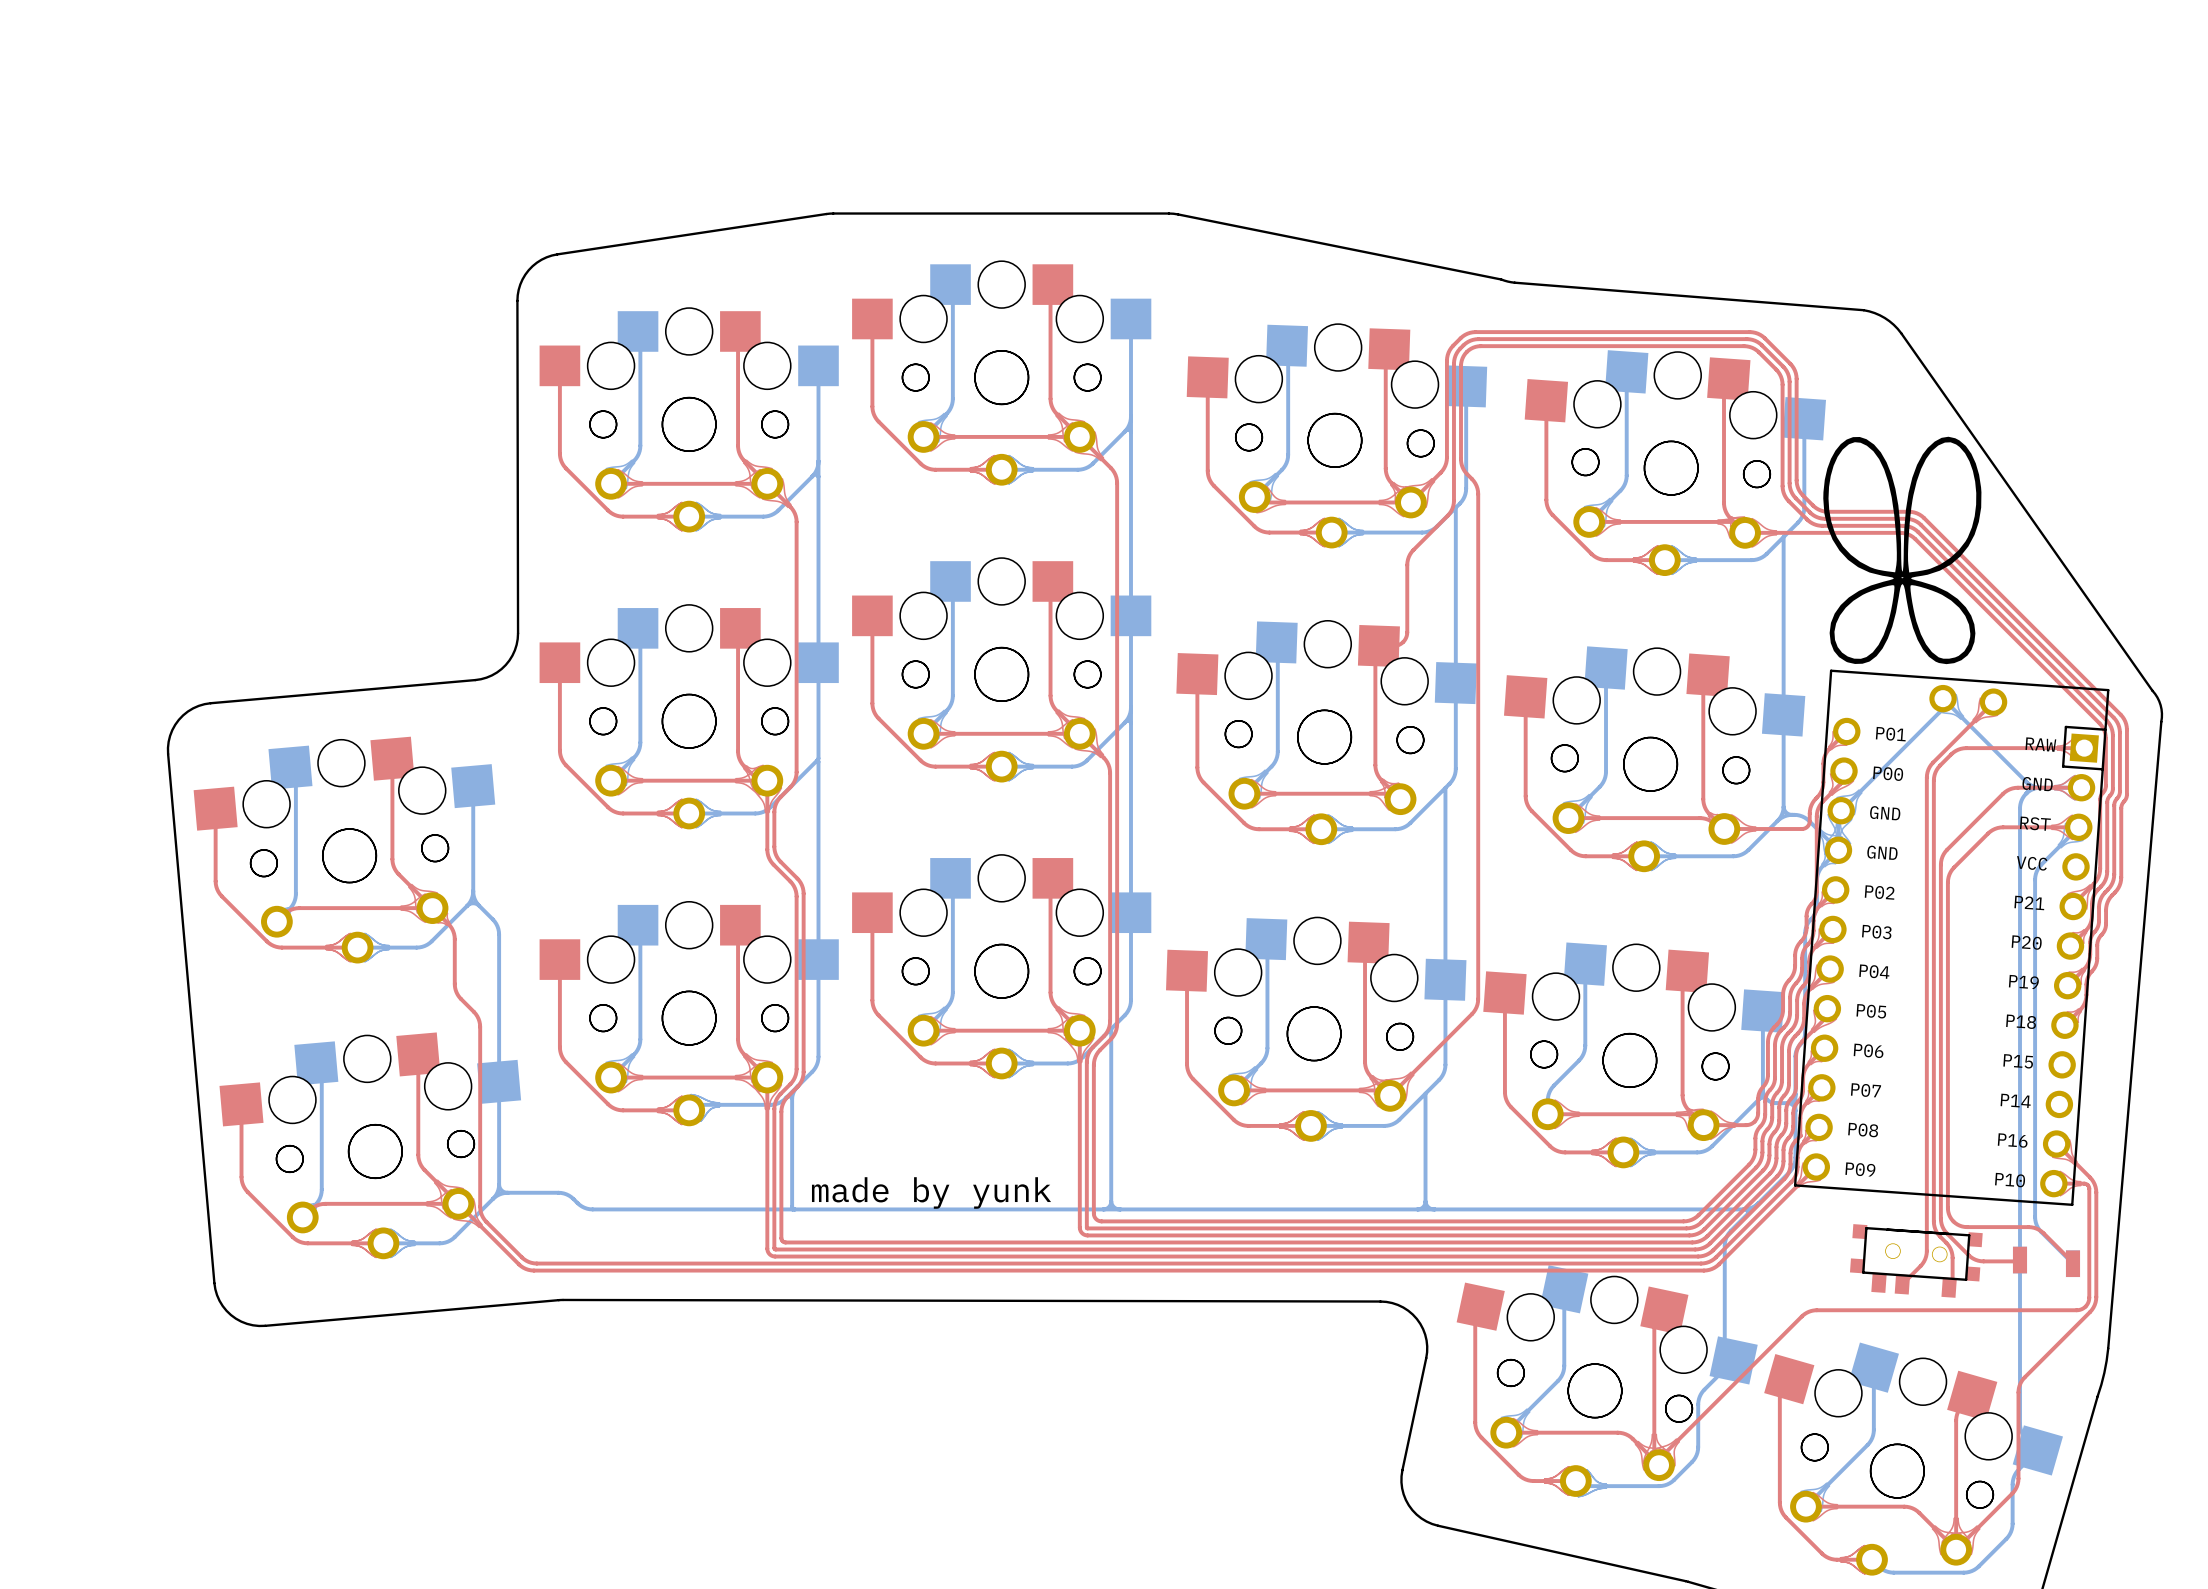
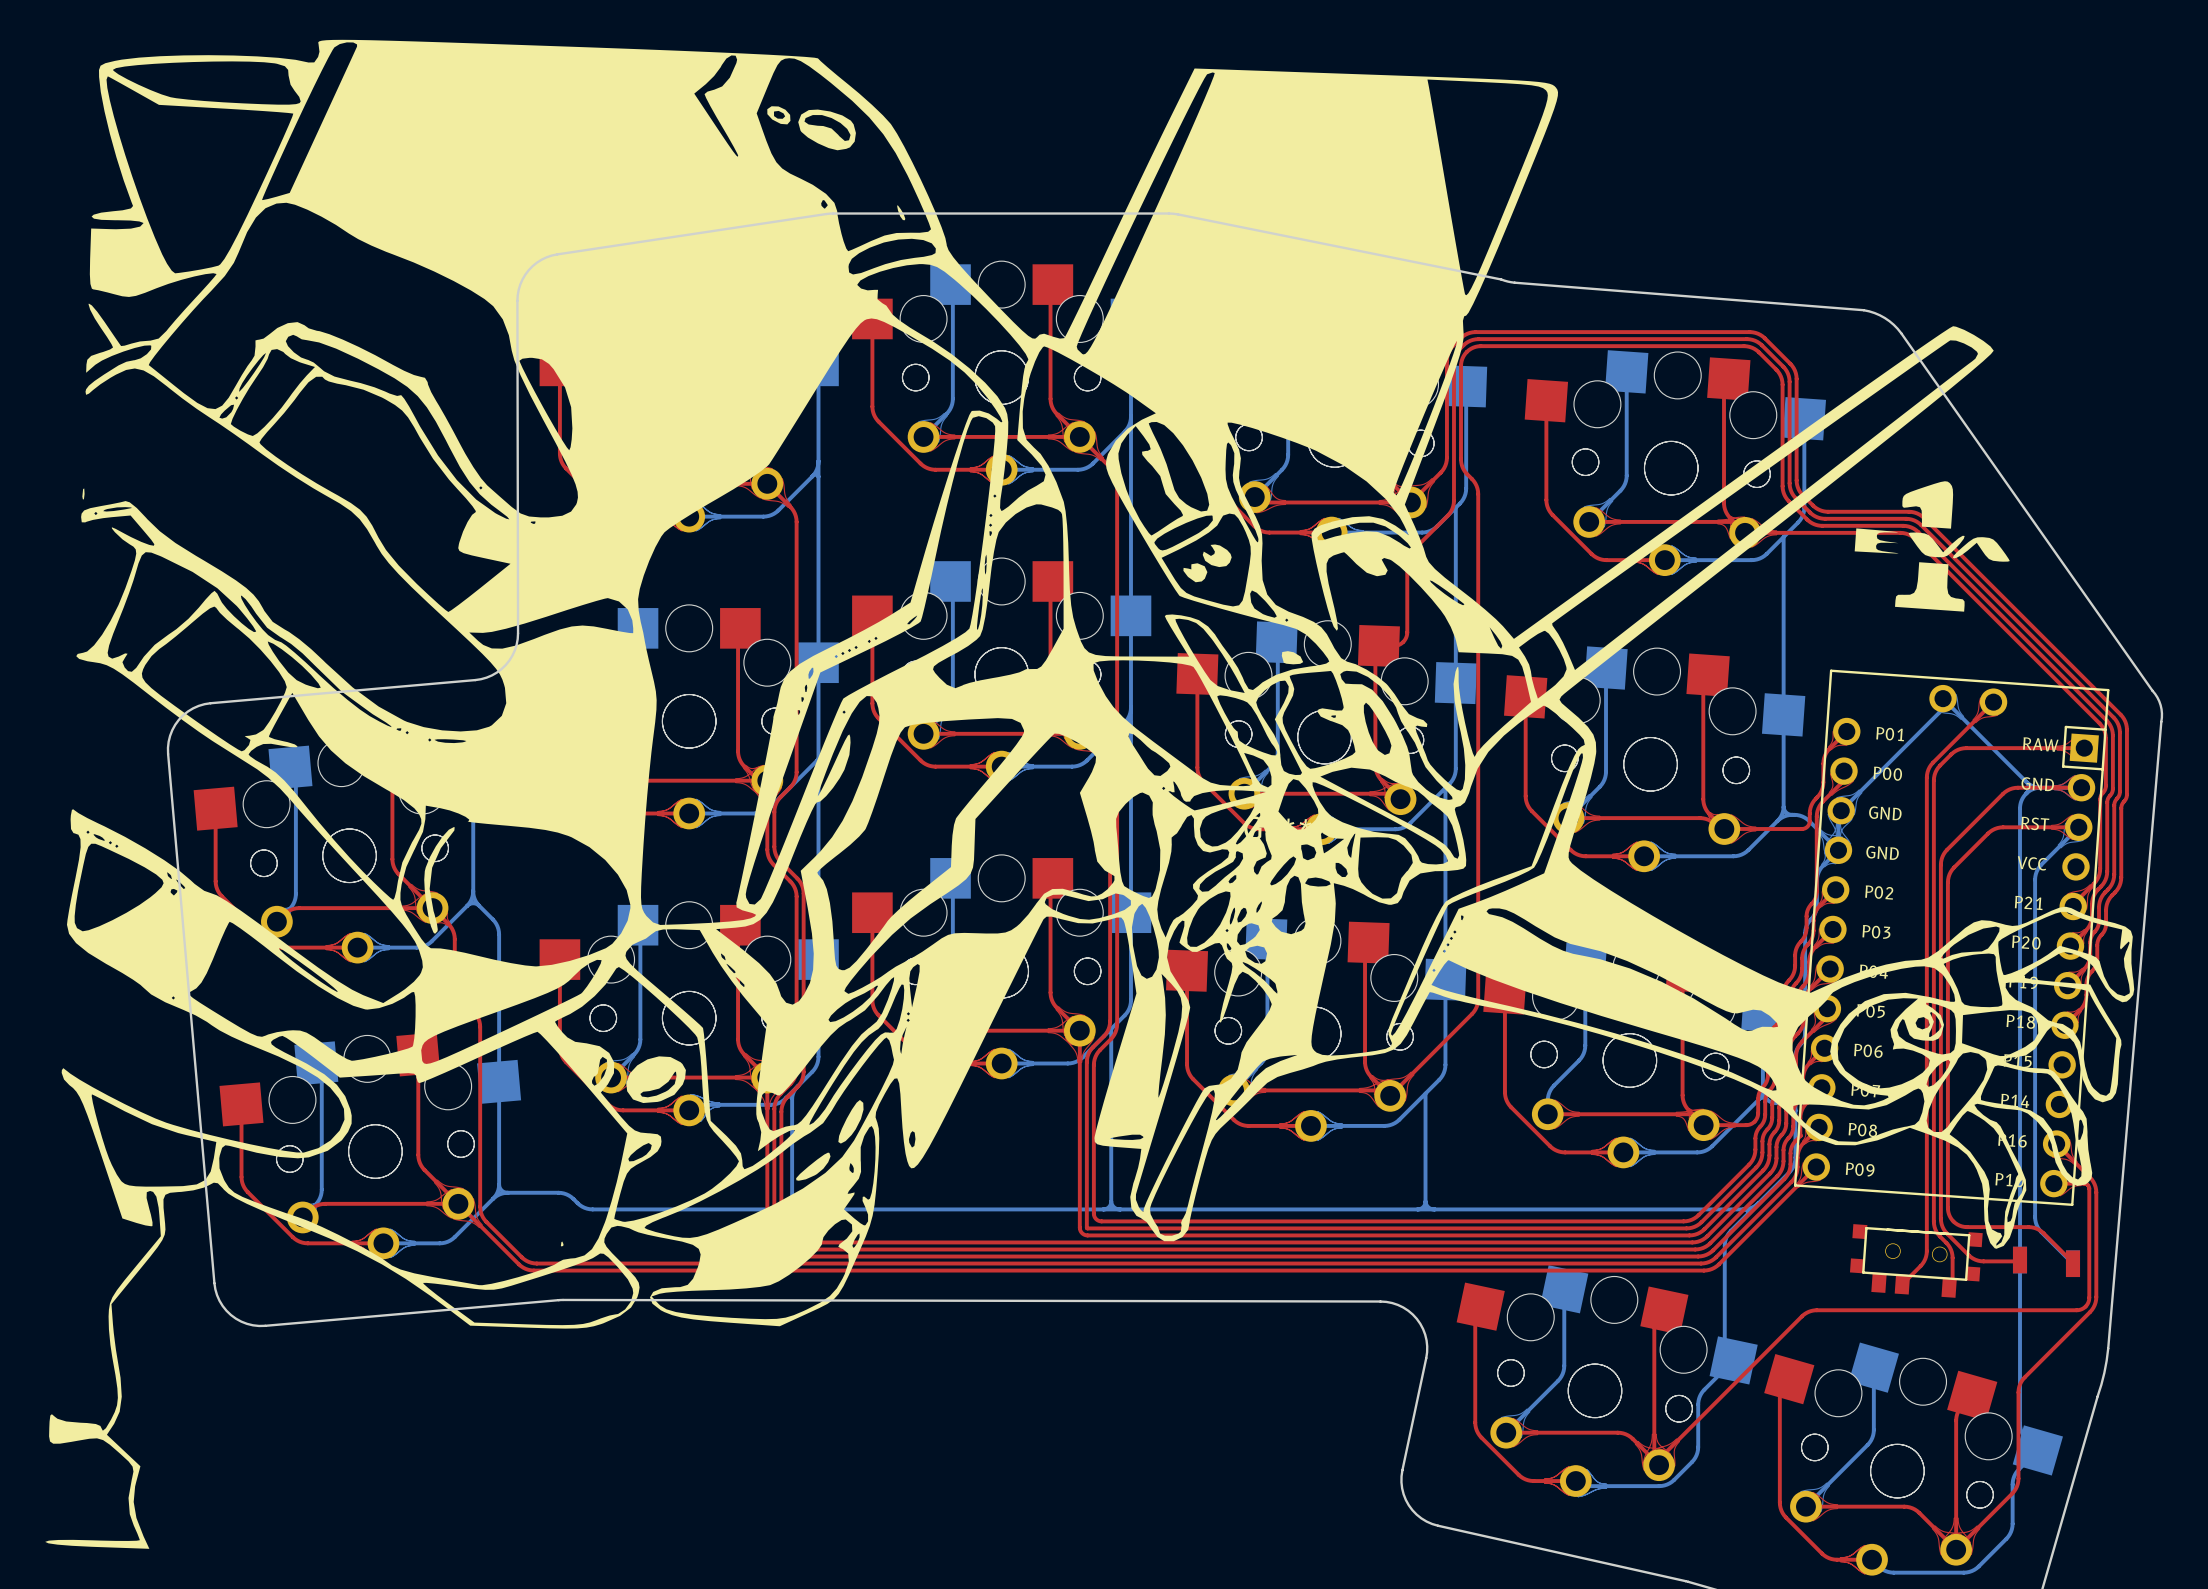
drawing: [1823, 436, 1982, 665] -> none
drawing: none -> [1854, 481, 2010, 612]
part: none -> (1089, 794)
text: made by yunk (931, 1192) -> none

